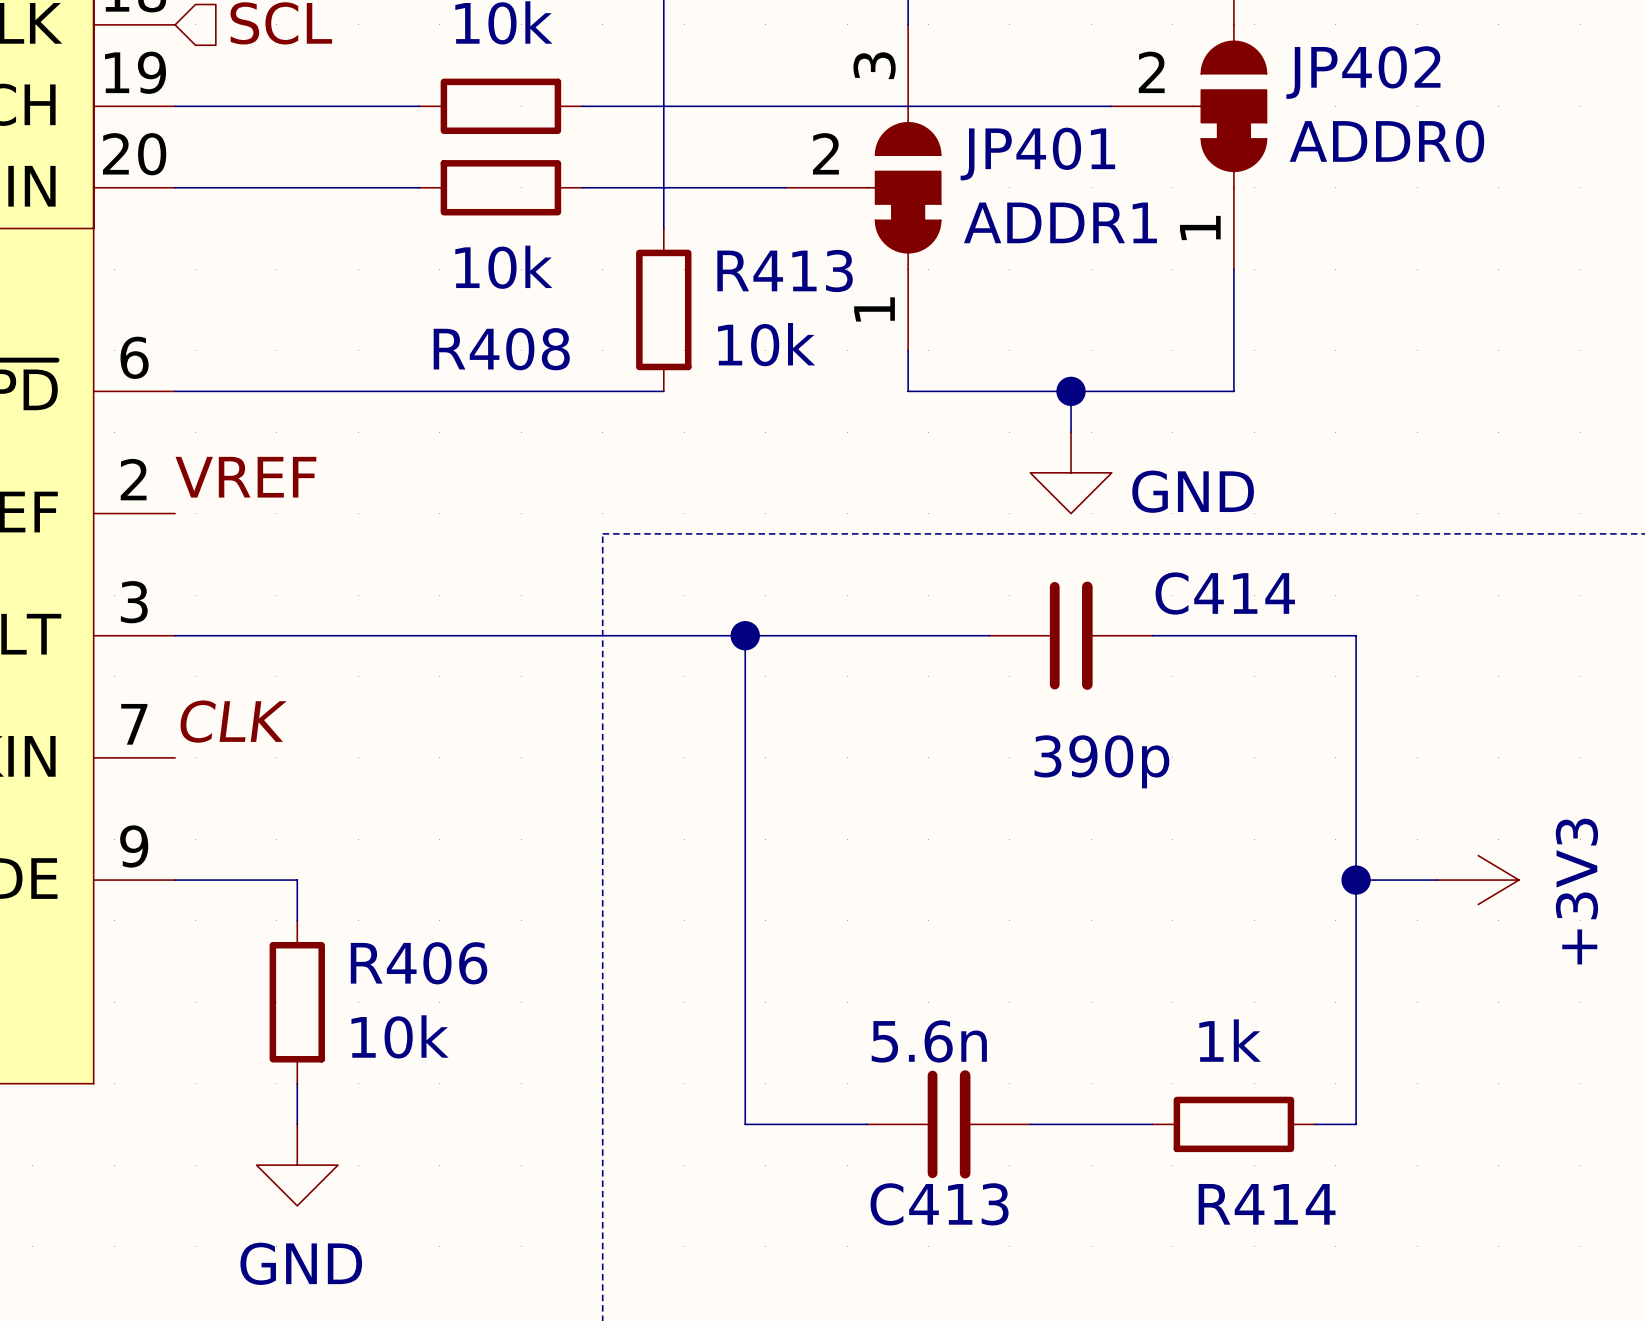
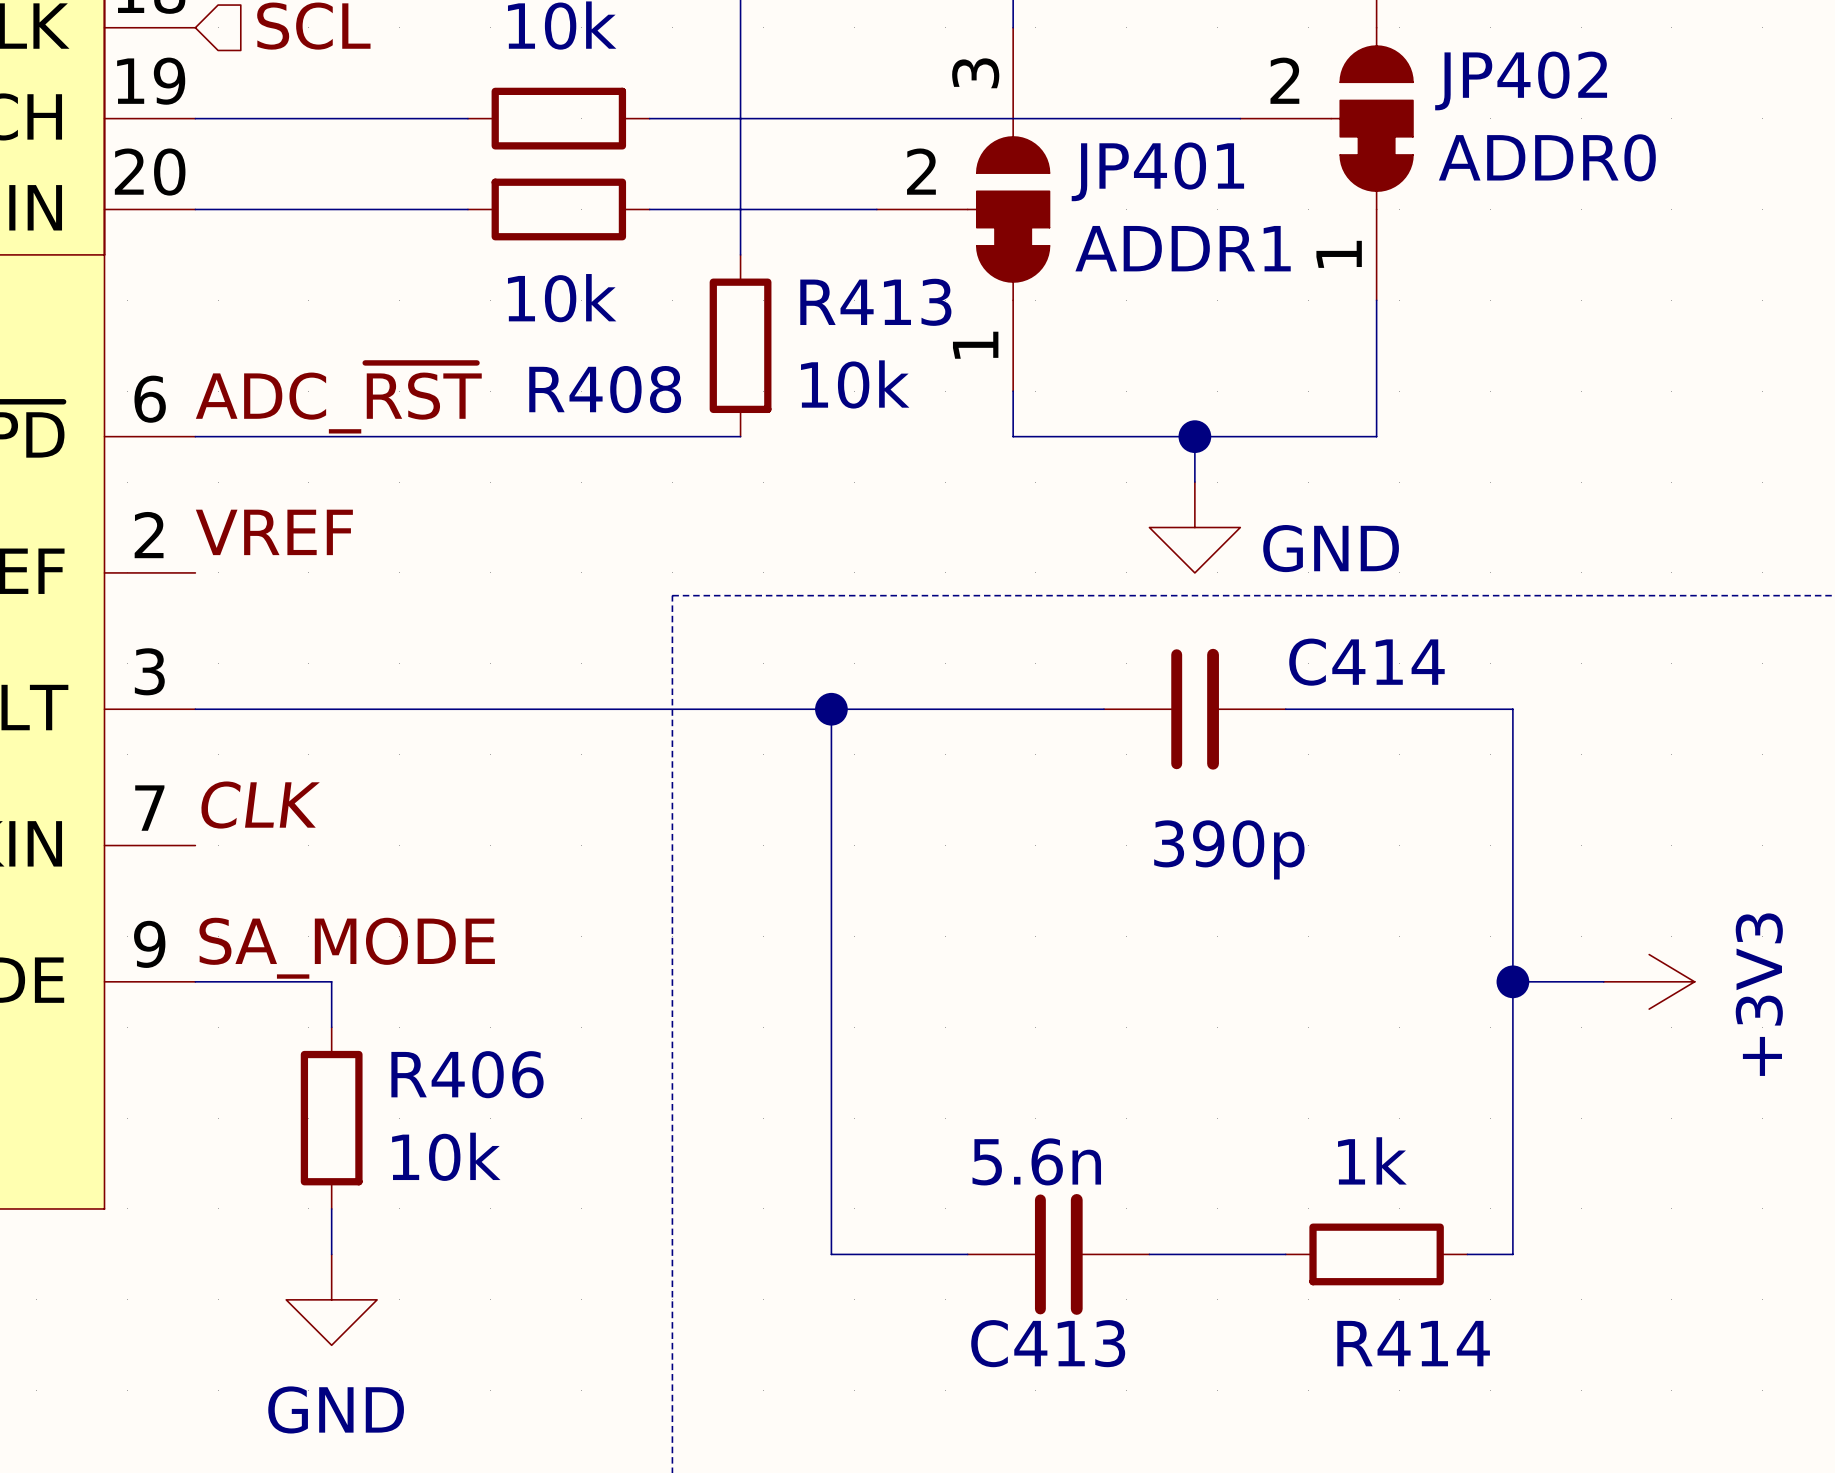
R408 name position: R408 (501, 349) -> R408 (605, 389)
label: none -> ADC_~{RST} (338, 398)
label: none -> SA_MODE (347, 948)

